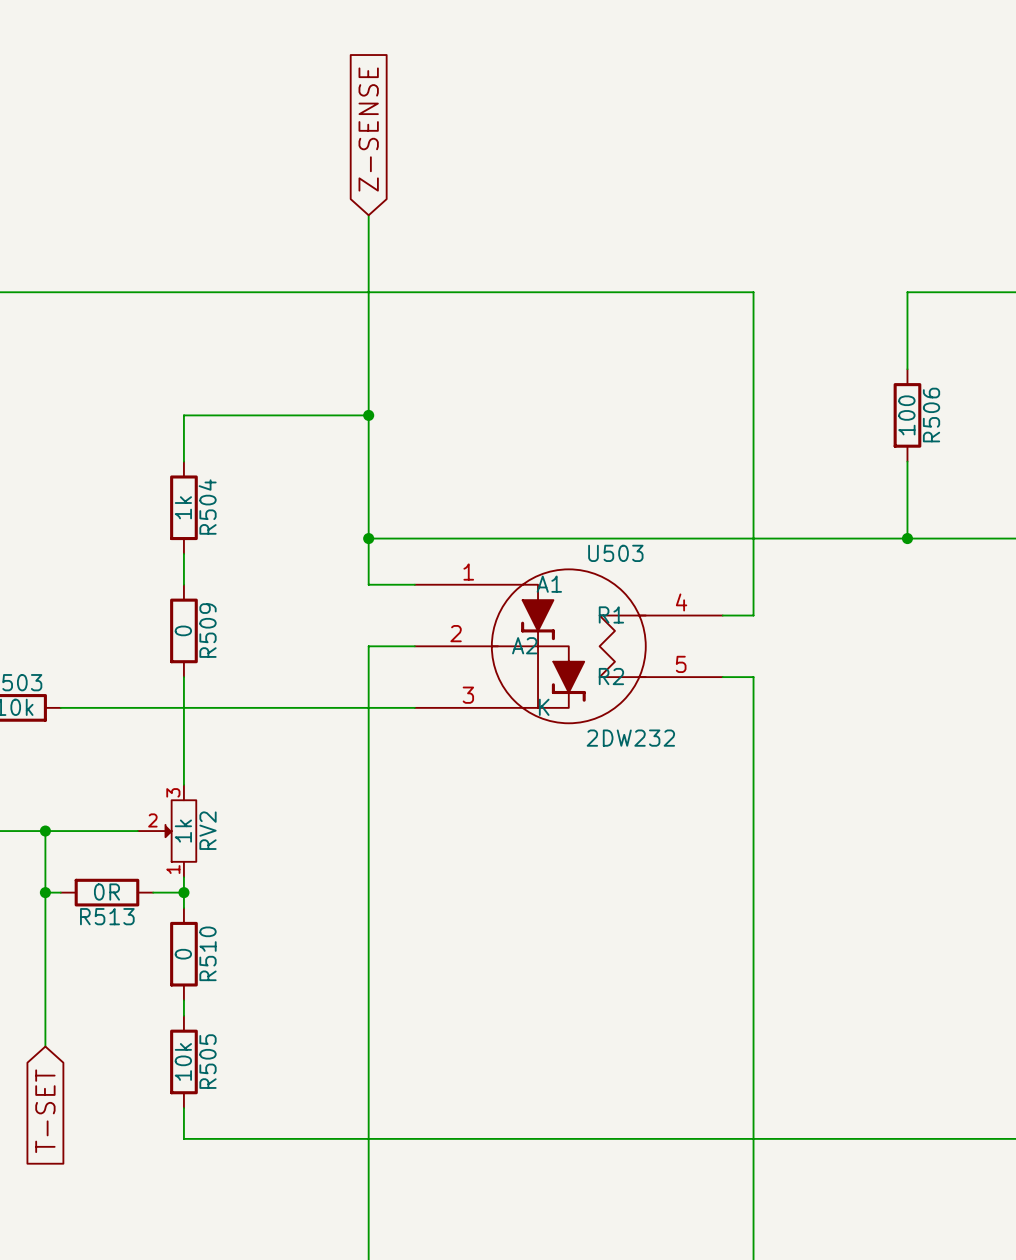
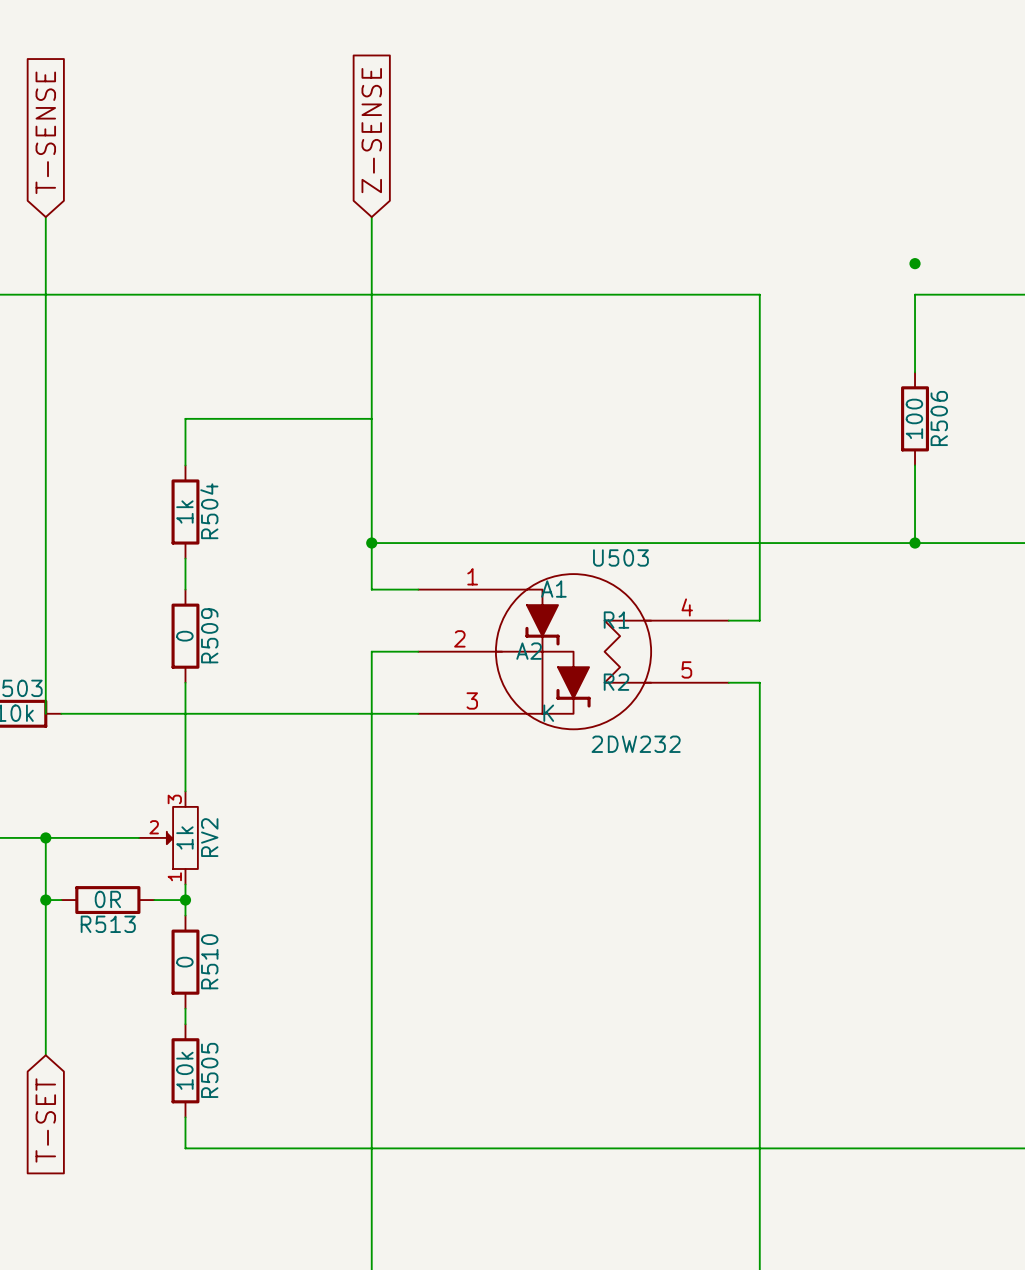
global label: none -> T-SENSE (45, 132)
wire: none -> (45, 217) (45, 713)
junction: none -> (915, 263)
junction: (368, 415) -> none

